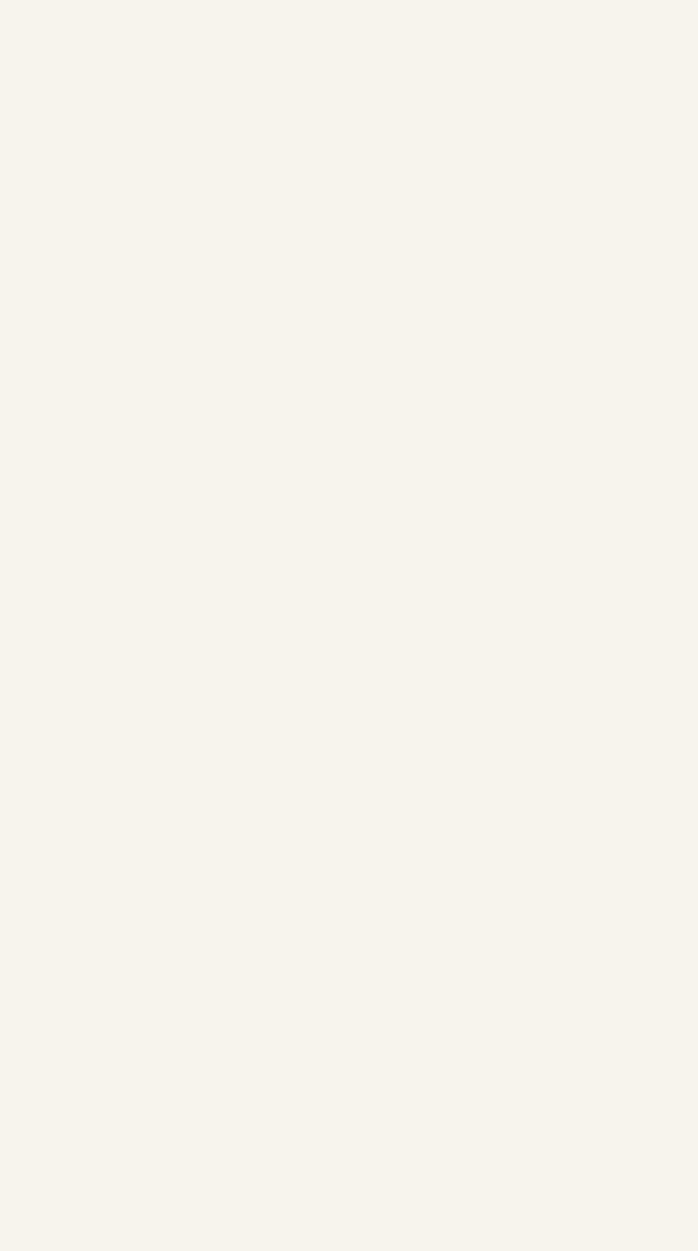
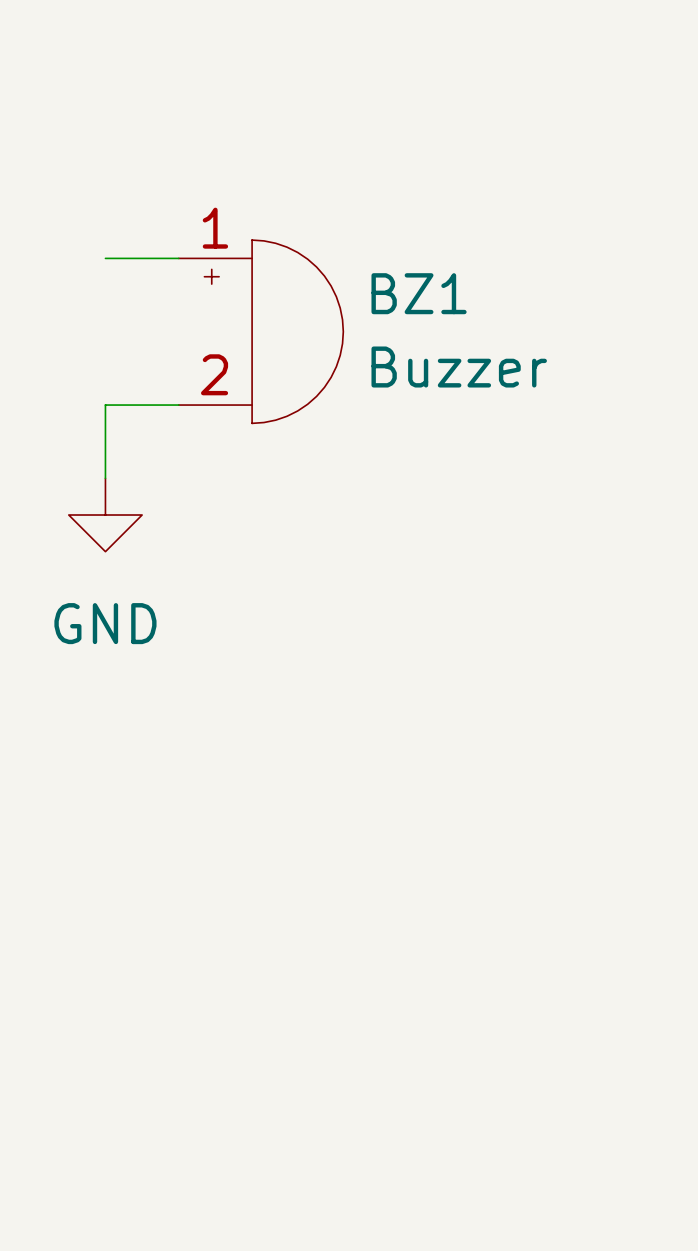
wire: none -> (105, 258) (178, 258)
BZ1: none -> Buzzer (261, 331)
wire: none -> (178, 405) (105, 405) (105, 478)
power symbol: none -> GND (105, 515)

